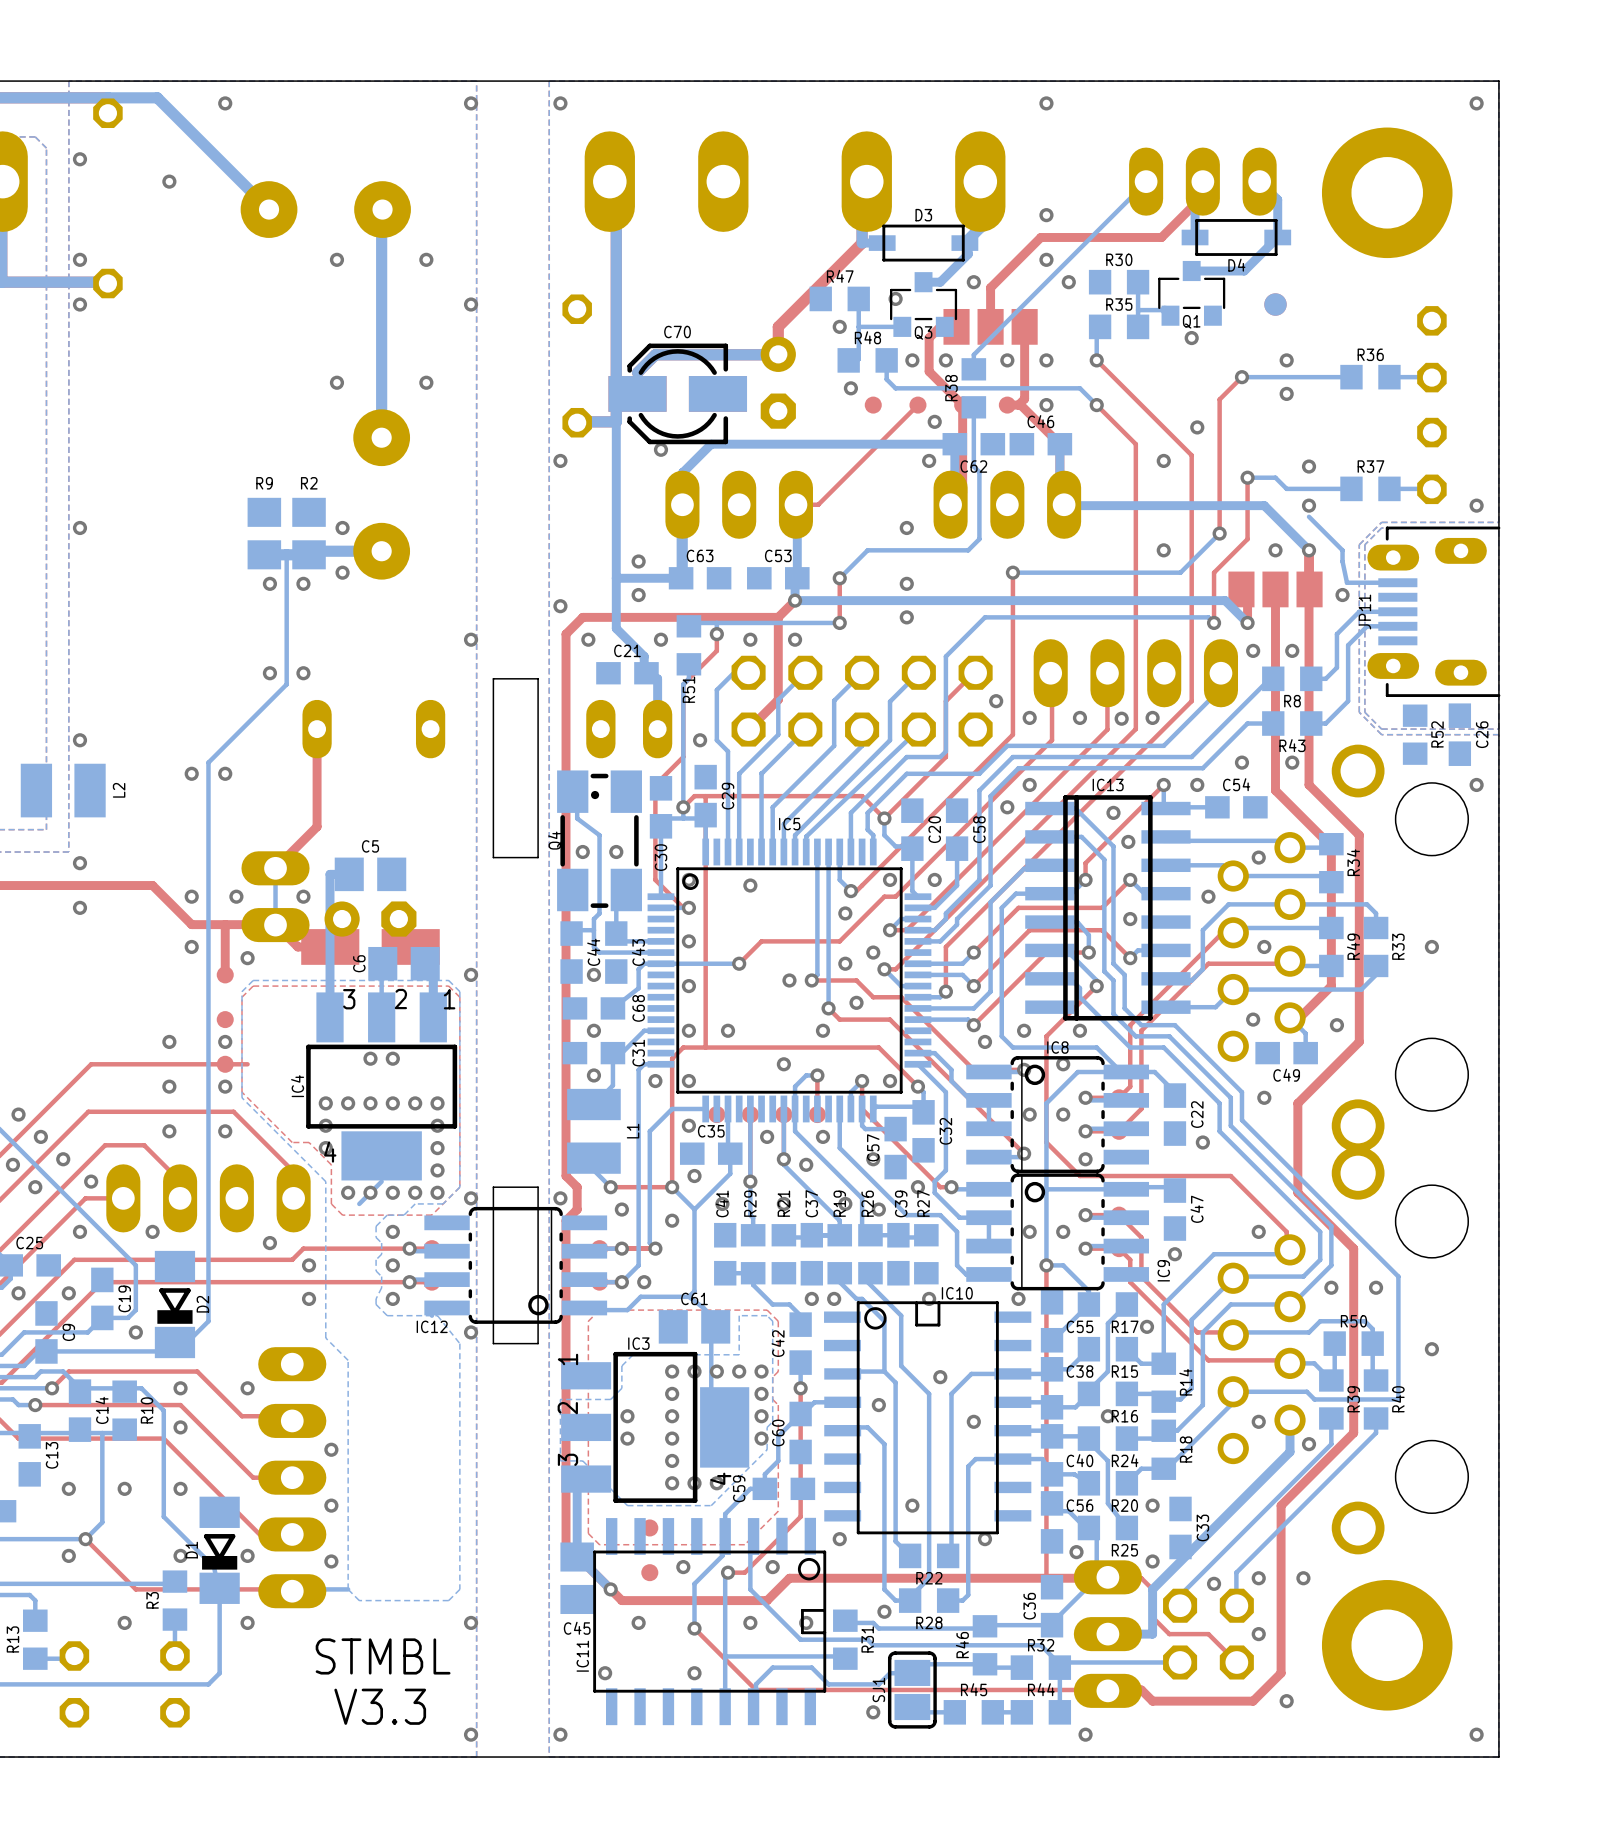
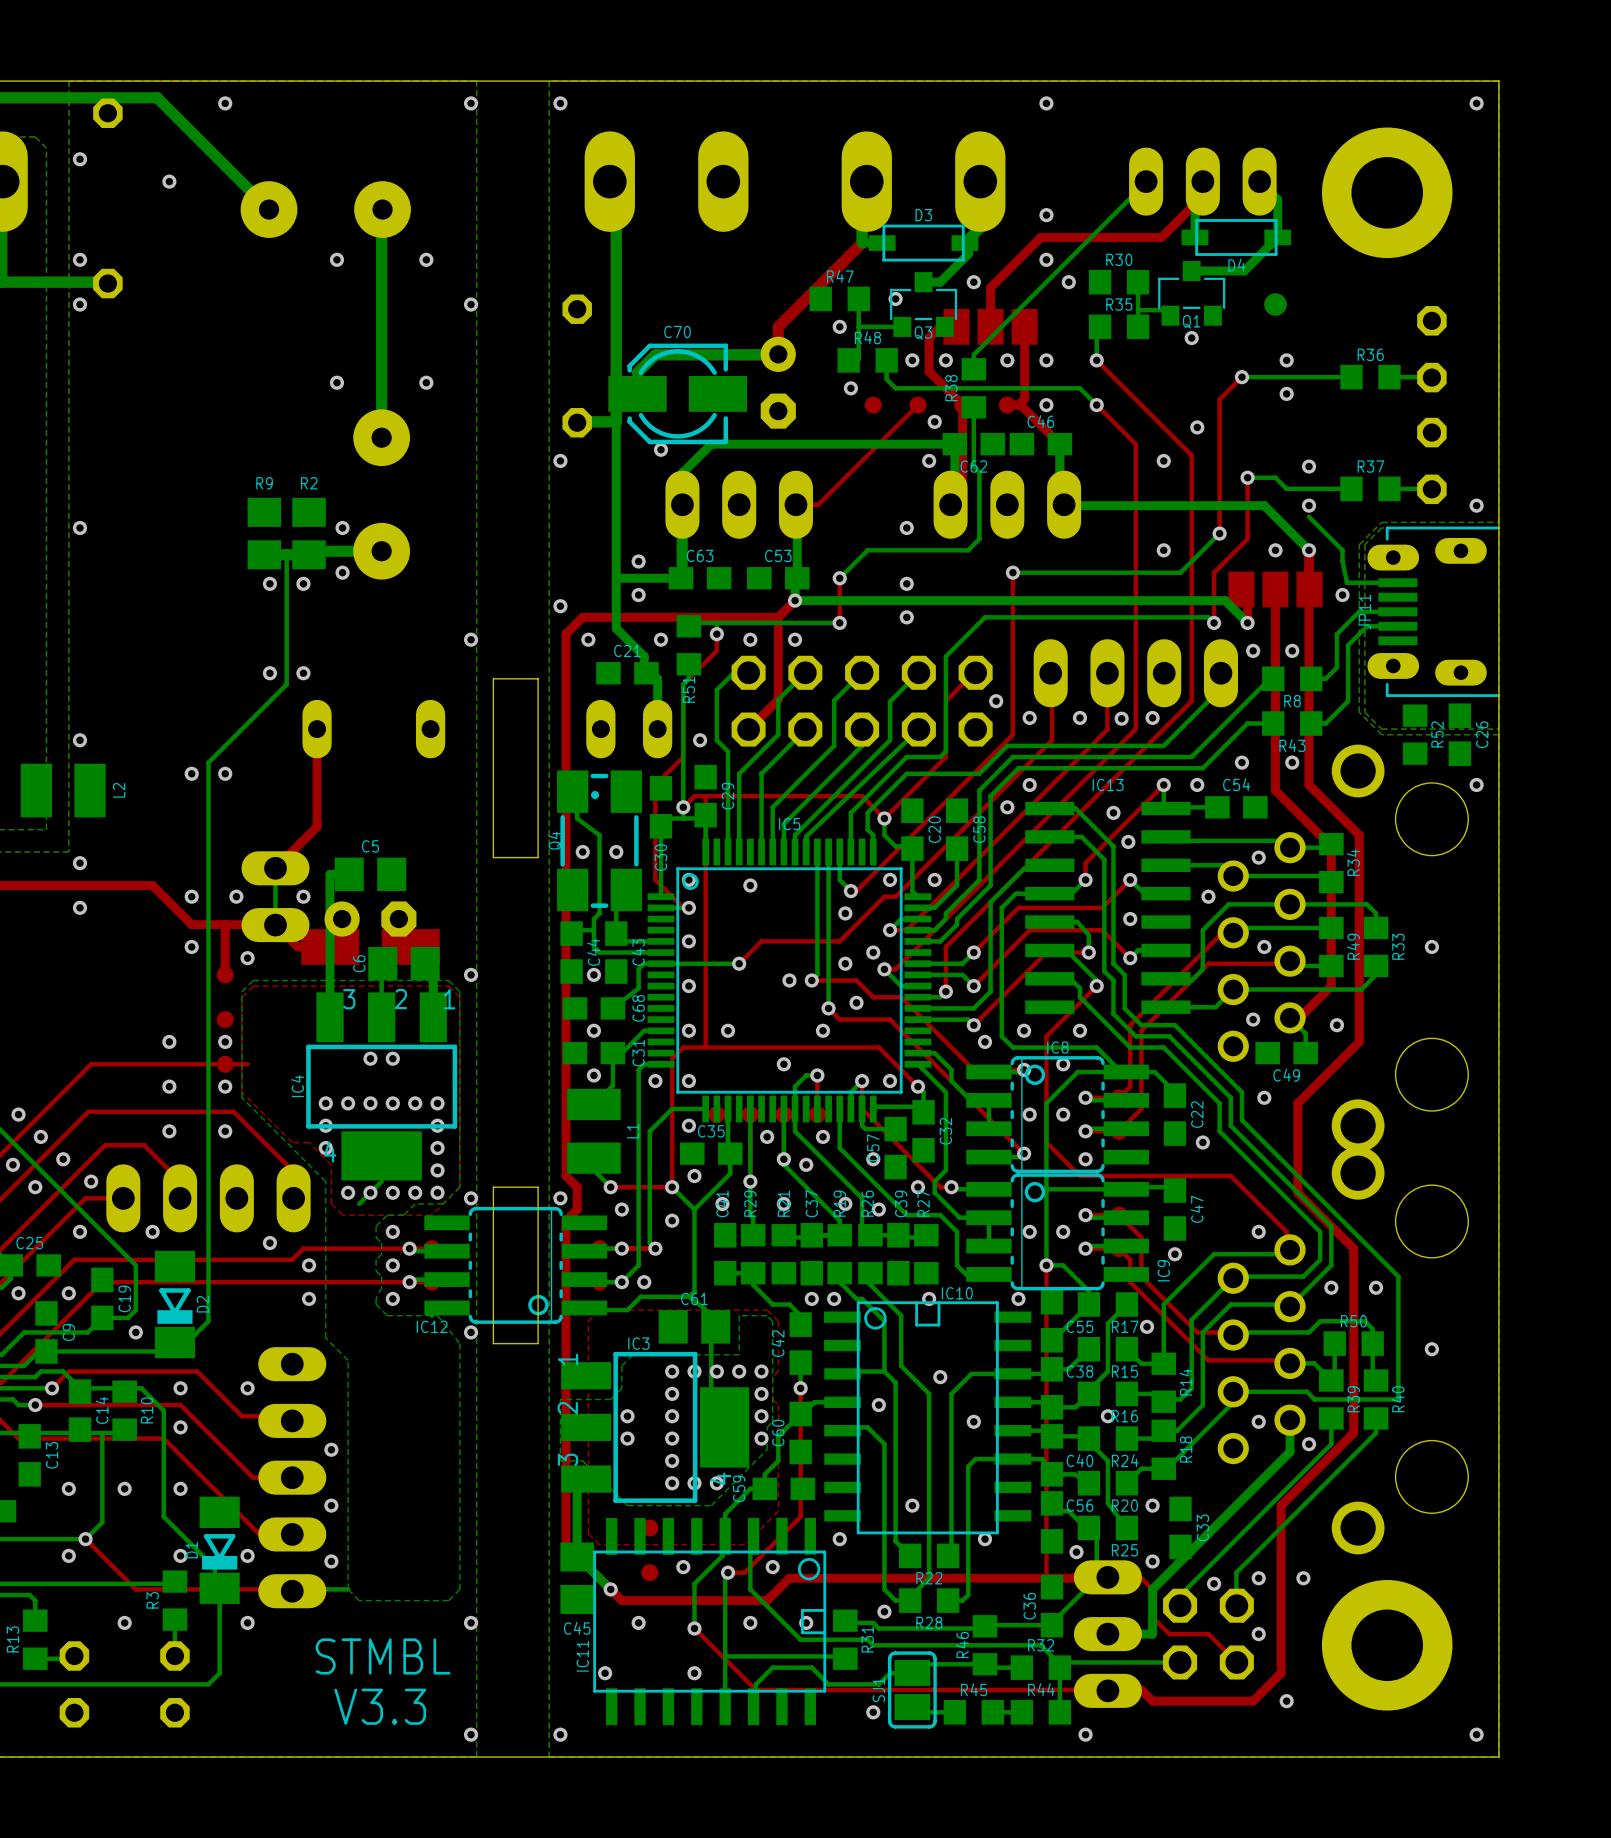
IC13 footprint: [1025, 795, 1191, 1021] -> [1025, 801, 1191, 1014]

